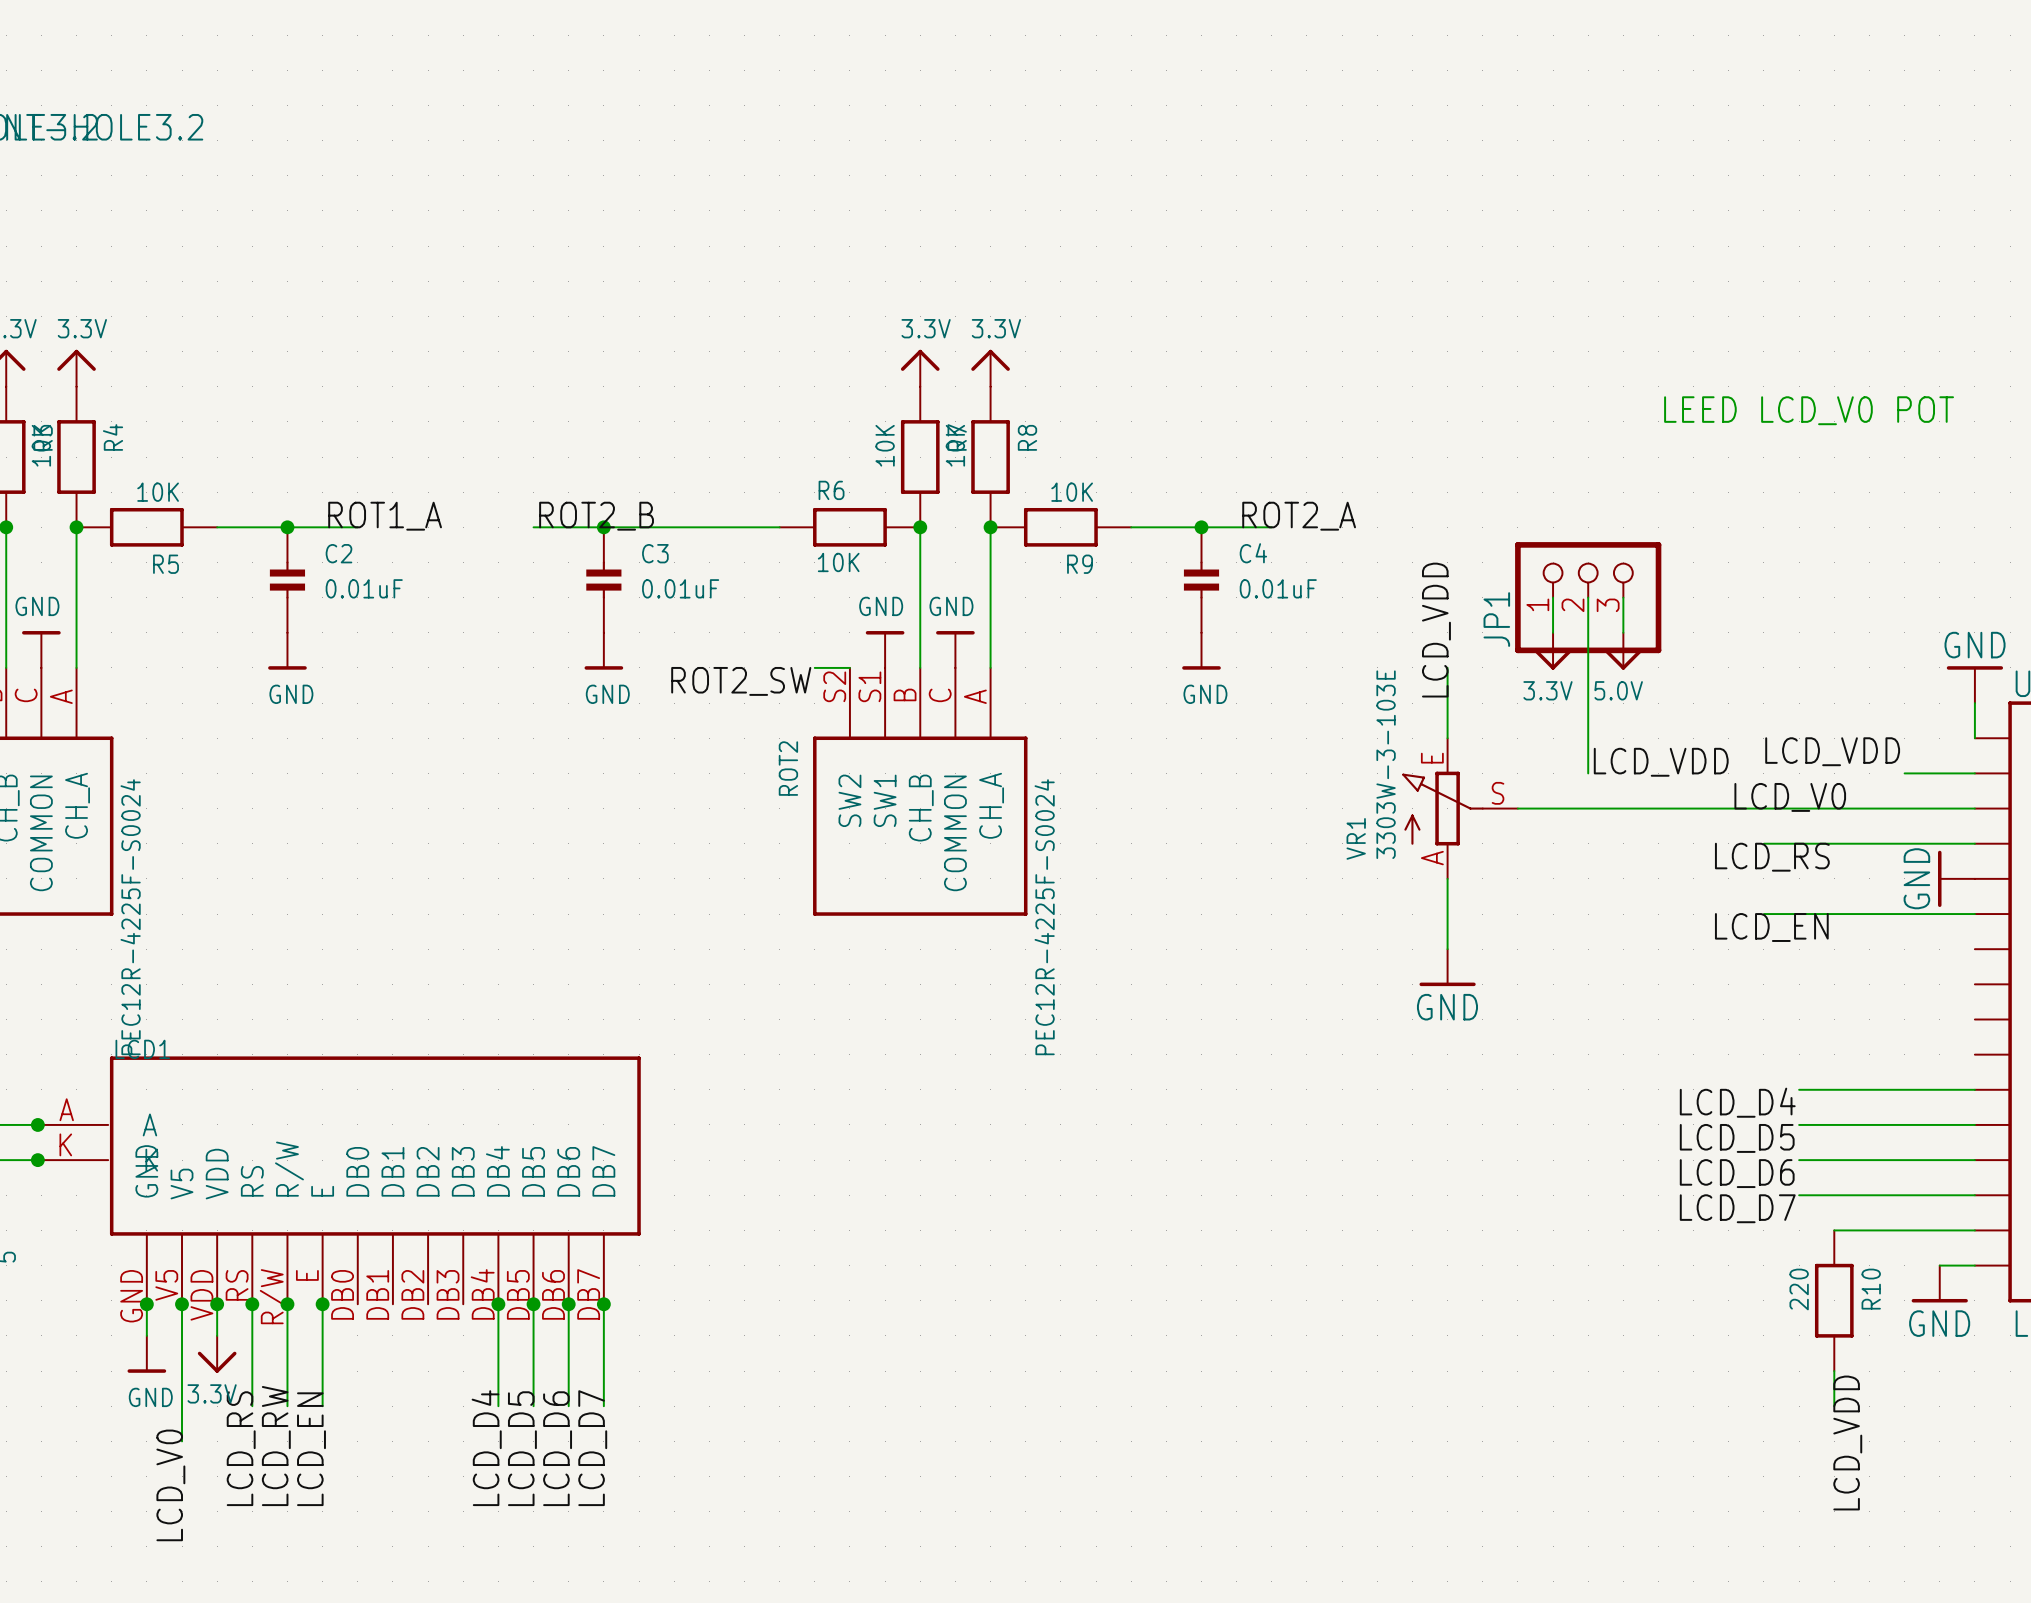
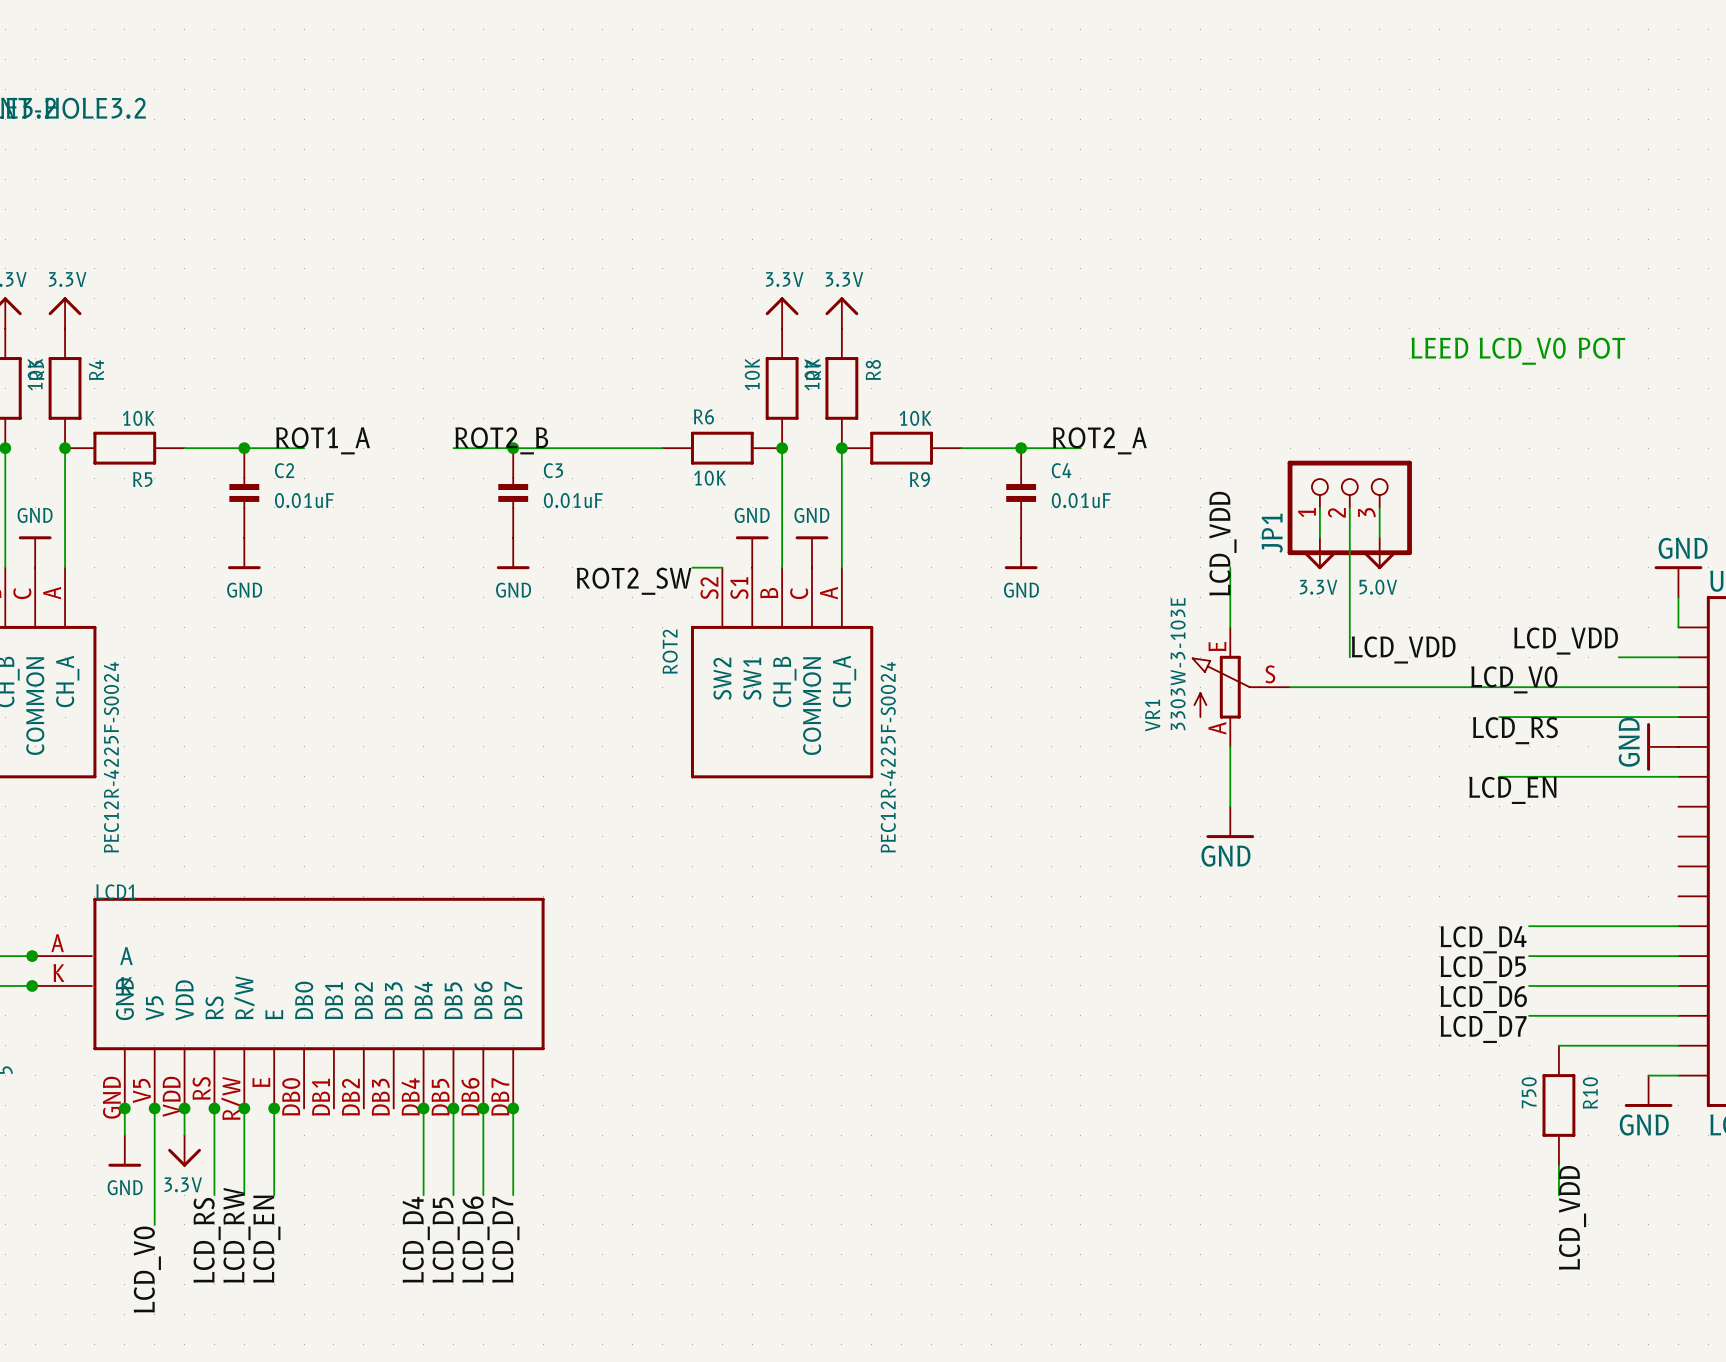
R10 value: 220 (1799, 1289) -> 750 (1529, 1092)

